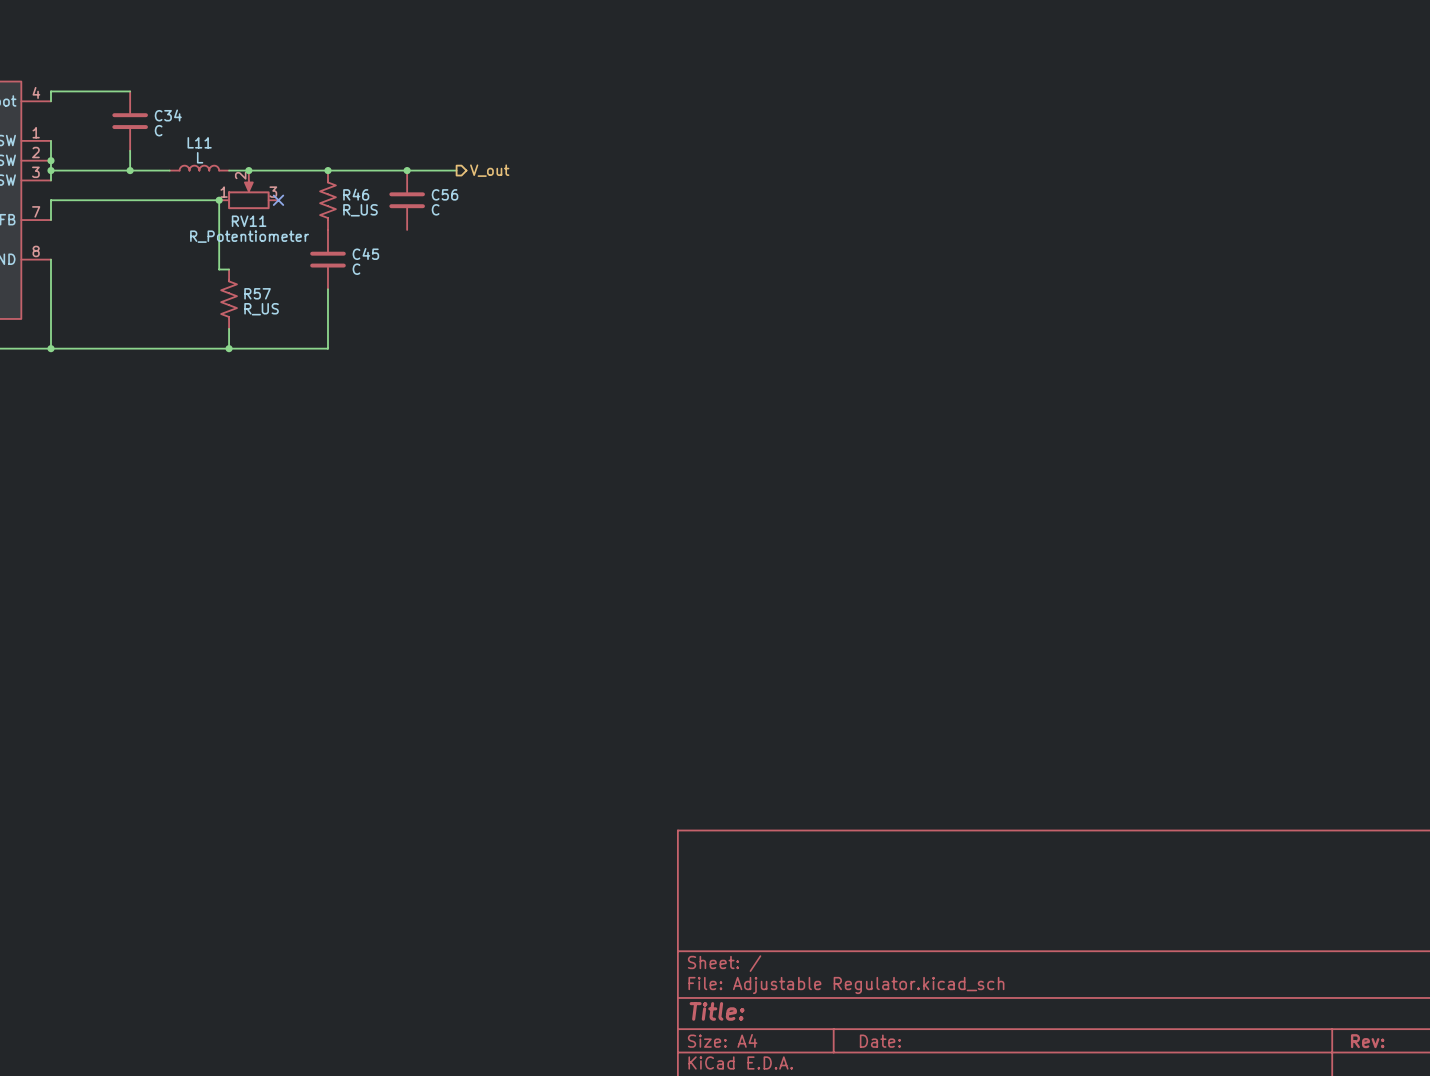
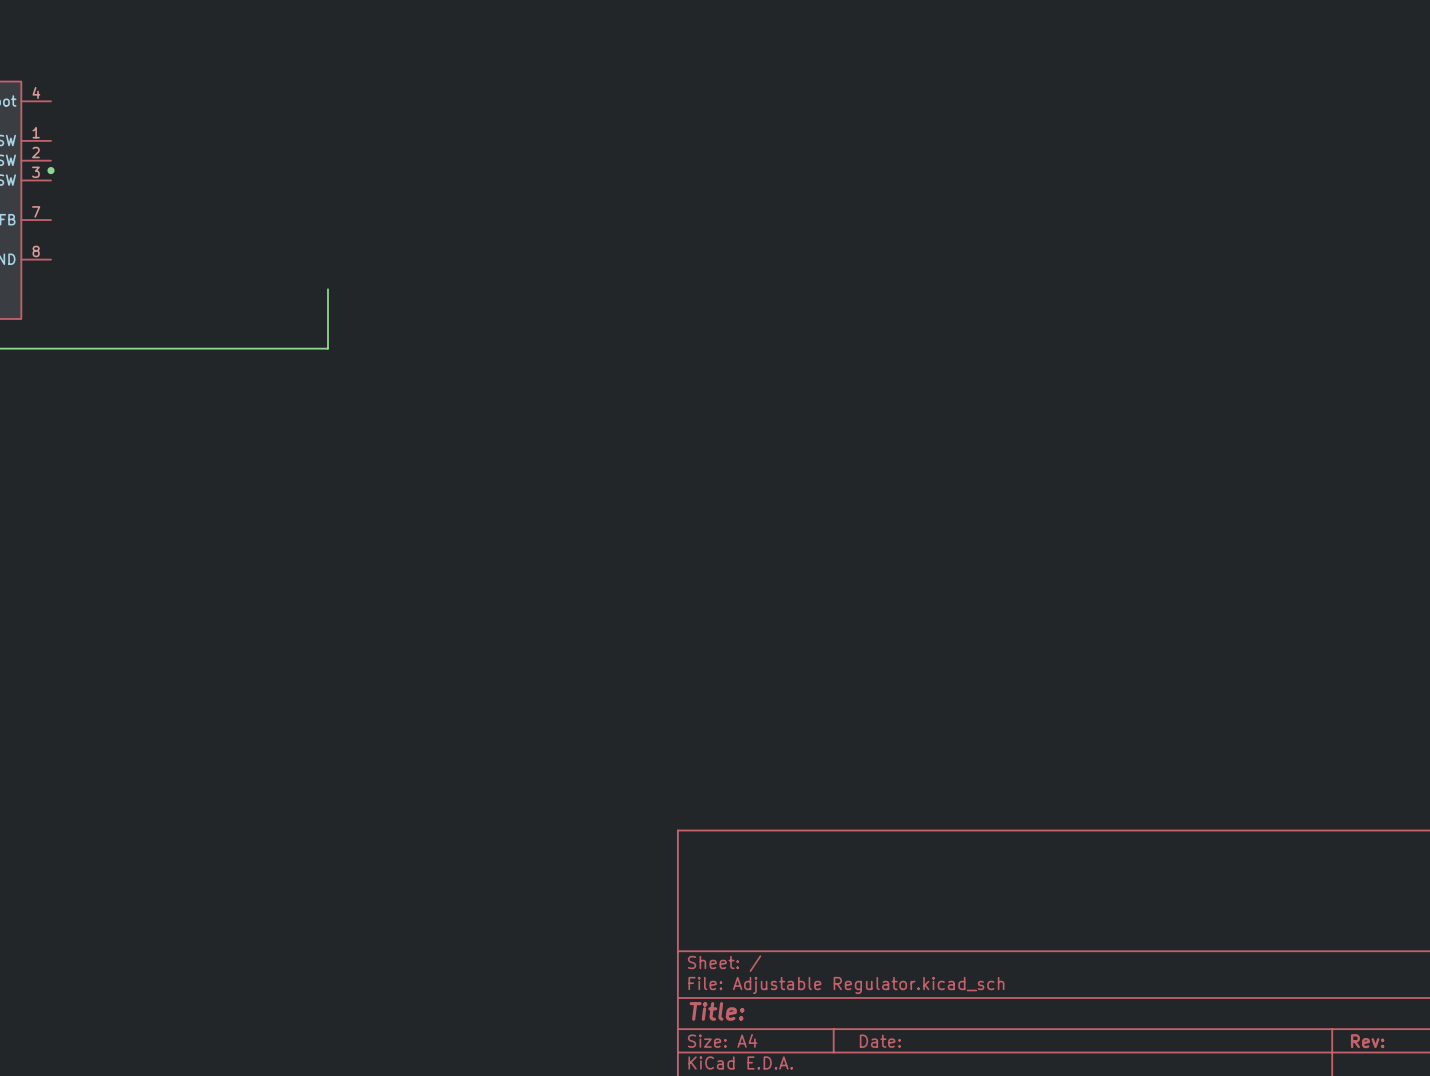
wire: (130, 91) (50, 91) (50, 101) -> none
C34: C (130, 121) -> none
wire: (50, 140) (50, 180) -> none
wire: (130, 150) (130, 170) -> none
junction: (50, 160) -> none
L11: L (199, 168) -> none
wire: (50, 170) (169, 170) -> none
junction: (130, 170) -> none
wire: (229, 170) (456, 170) -> none
junction: (248, 170) -> none
junction: (327, 170) -> none
junction: (407, 170) -> none
hierarchical label: V_out (489, 170) -> none
RV11: R_Potentiometer (248, 189) -> none
junction: (219, 200) -> none
no-connect mark: (278, 200) -> none
R46: R_US (327, 200) -> none
C56: C (407, 200) -> none
wire: (50, 220) (50, 200) (219, 200) (219, 269) (229, 269) -> none
wire: (50, 259) (50, 348) -> none
C45: C (327, 259) -> none
R57: R_US (229, 299) -> none
wire: (229, 328) (229, 348) -> none
junction: (50, 348) -> none
junction: (229, 348) -> none

